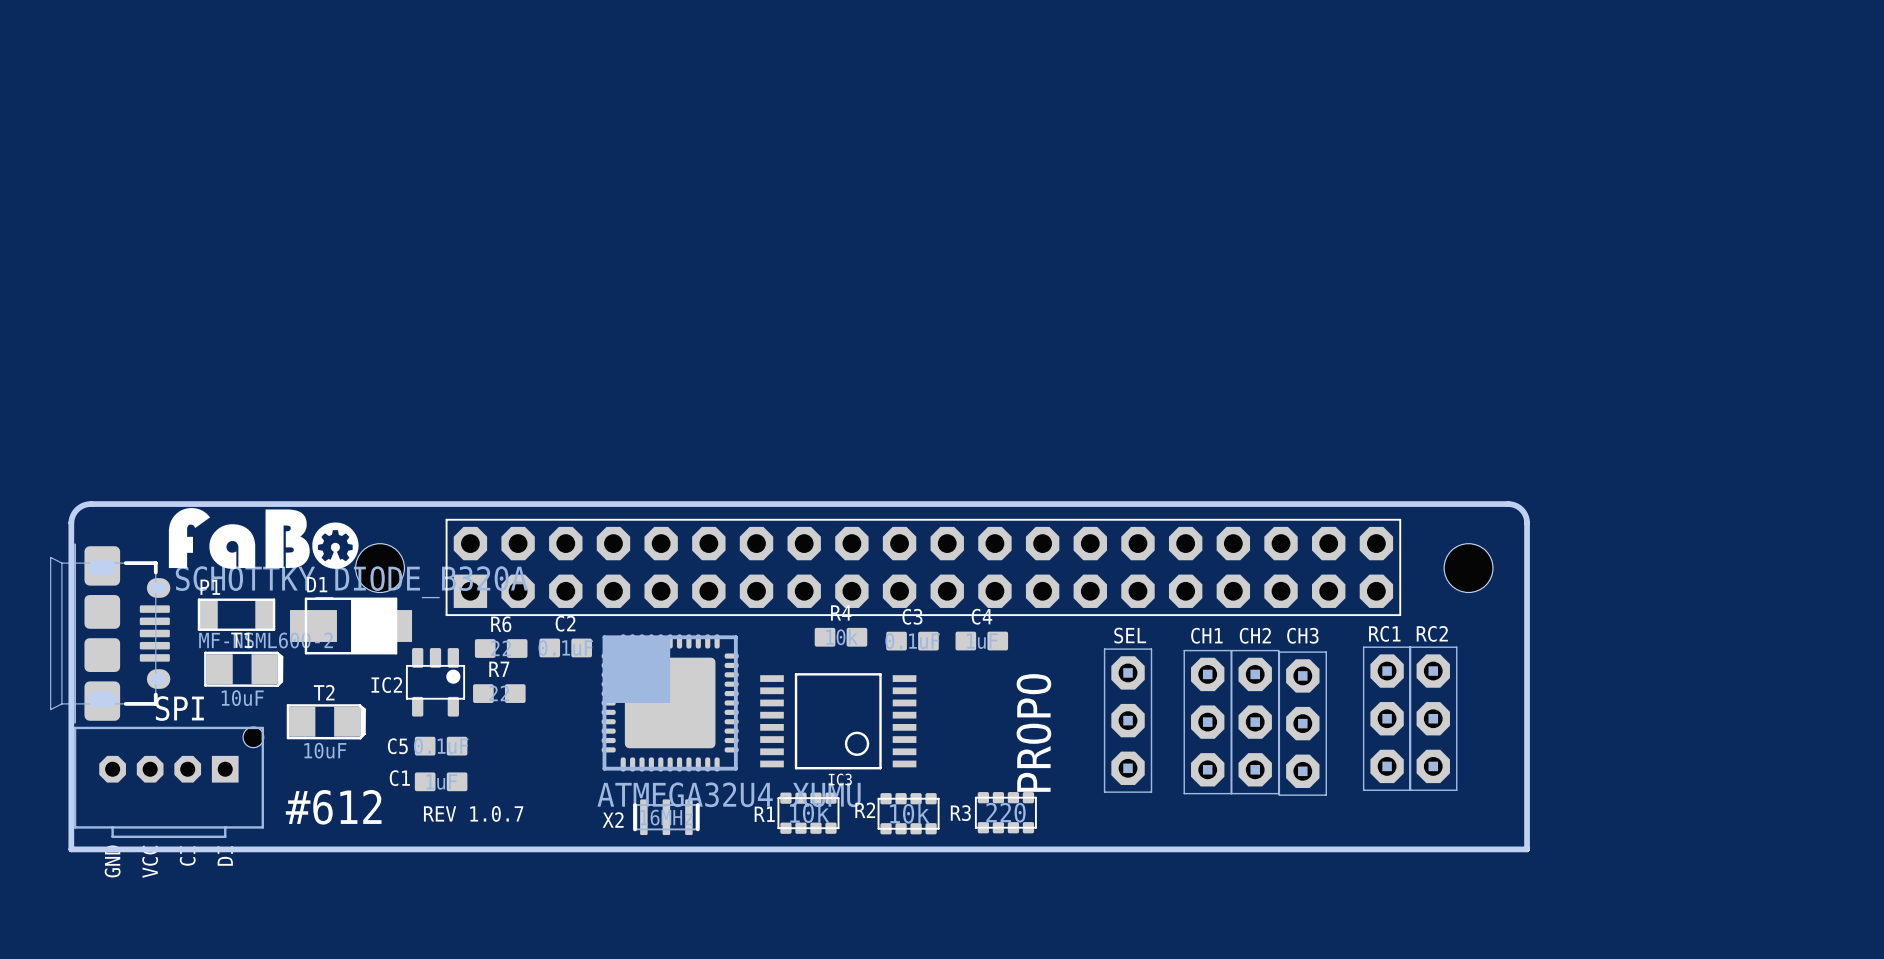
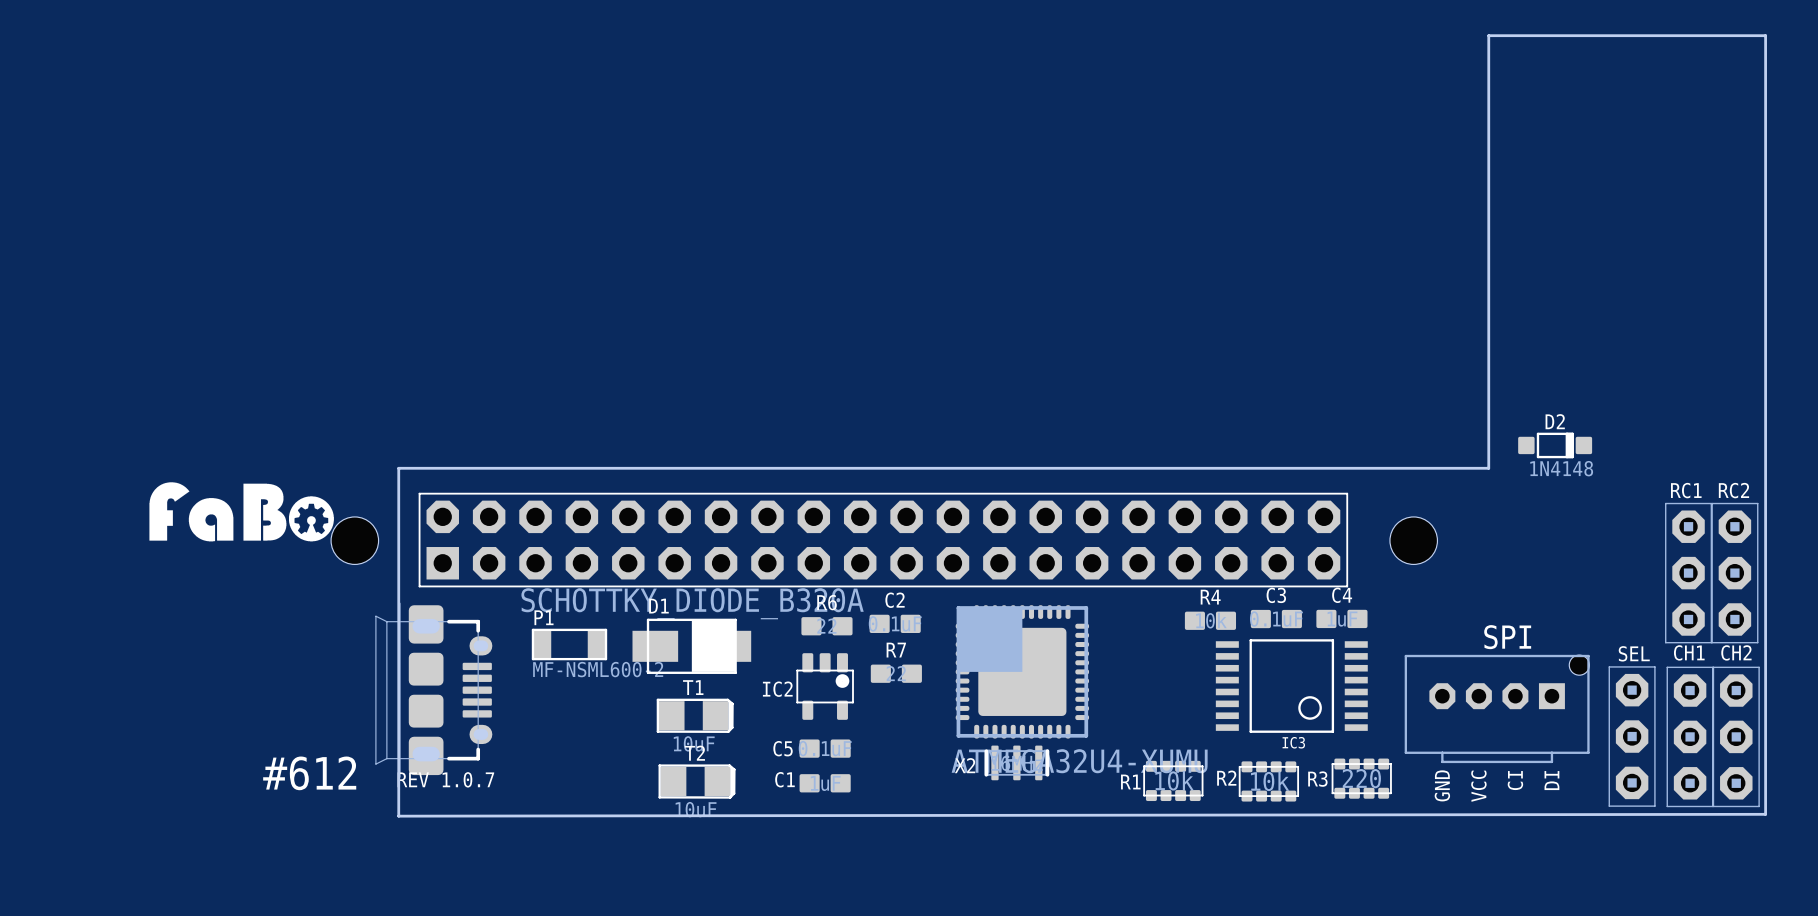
board edge: none -> (1488, 35) (1488, 468) (398, 468) (398, 816) (1765, 814) (1765, 35) (1488, 35)
D2: none -> 1N4148 (1555, 445)
board edge: (91, 504) (1513, 504) (1523, 511) (1527, 522) (1527, 849) (71, 849) (71, 522) (77, 509) (91, 504) -> none
P1 position: (236, 614) -> (569, 644)
D1 position: (351, 626) -> (691, 646)
part position: (110, 633) -> (433, 690)
R4 position: (840, 637) -> (1210, 620)
C3 position: (912, 641) -> (1276, 619)
C4 position: (981, 641) -> (1341, 618)
C2 position: (565, 647) -> (895, 623)
R6 position: (501, 648) -> (826, 626)
T1 position: (243, 669) -> (695, 715)
IC2 position: (435, 682) -> (825, 686)
R7 position: (499, 693) -> (896, 673)
part position: (670, 702) -> (1022, 671)
RC1 position: (1387, 718) -> (1688, 573)
RC2 position: (1433, 718) -> (1734, 573)
SEL: (1128, 720) -> none
T2 position: (326, 721) -> (697, 781)
IC3 position: (838, 721) -> (1291, 686)
CH1 position: (1207, 722) -> (1690, 736)
CH2 position: (1255, 722) -> (1736, 736)
CH3: (1302, 723) -> none
text: PROPO (1033, 732) -> none
SPI: none -> (1497, 708)
C5 position: (441, 746) -> (825, 748)
SEL: none -> (1632, 736)
C1 position: (441, 781) -> (825, 783)
SPI: (168, 782) -> none
R3 position: (1005, 812) -> (1361, 778)
R1 position: (808, 813) -> (1173, 780)
R2 position: (908, 813) -> (1268, 781)
X2 position: (666, 817) -> (1016, 762)

